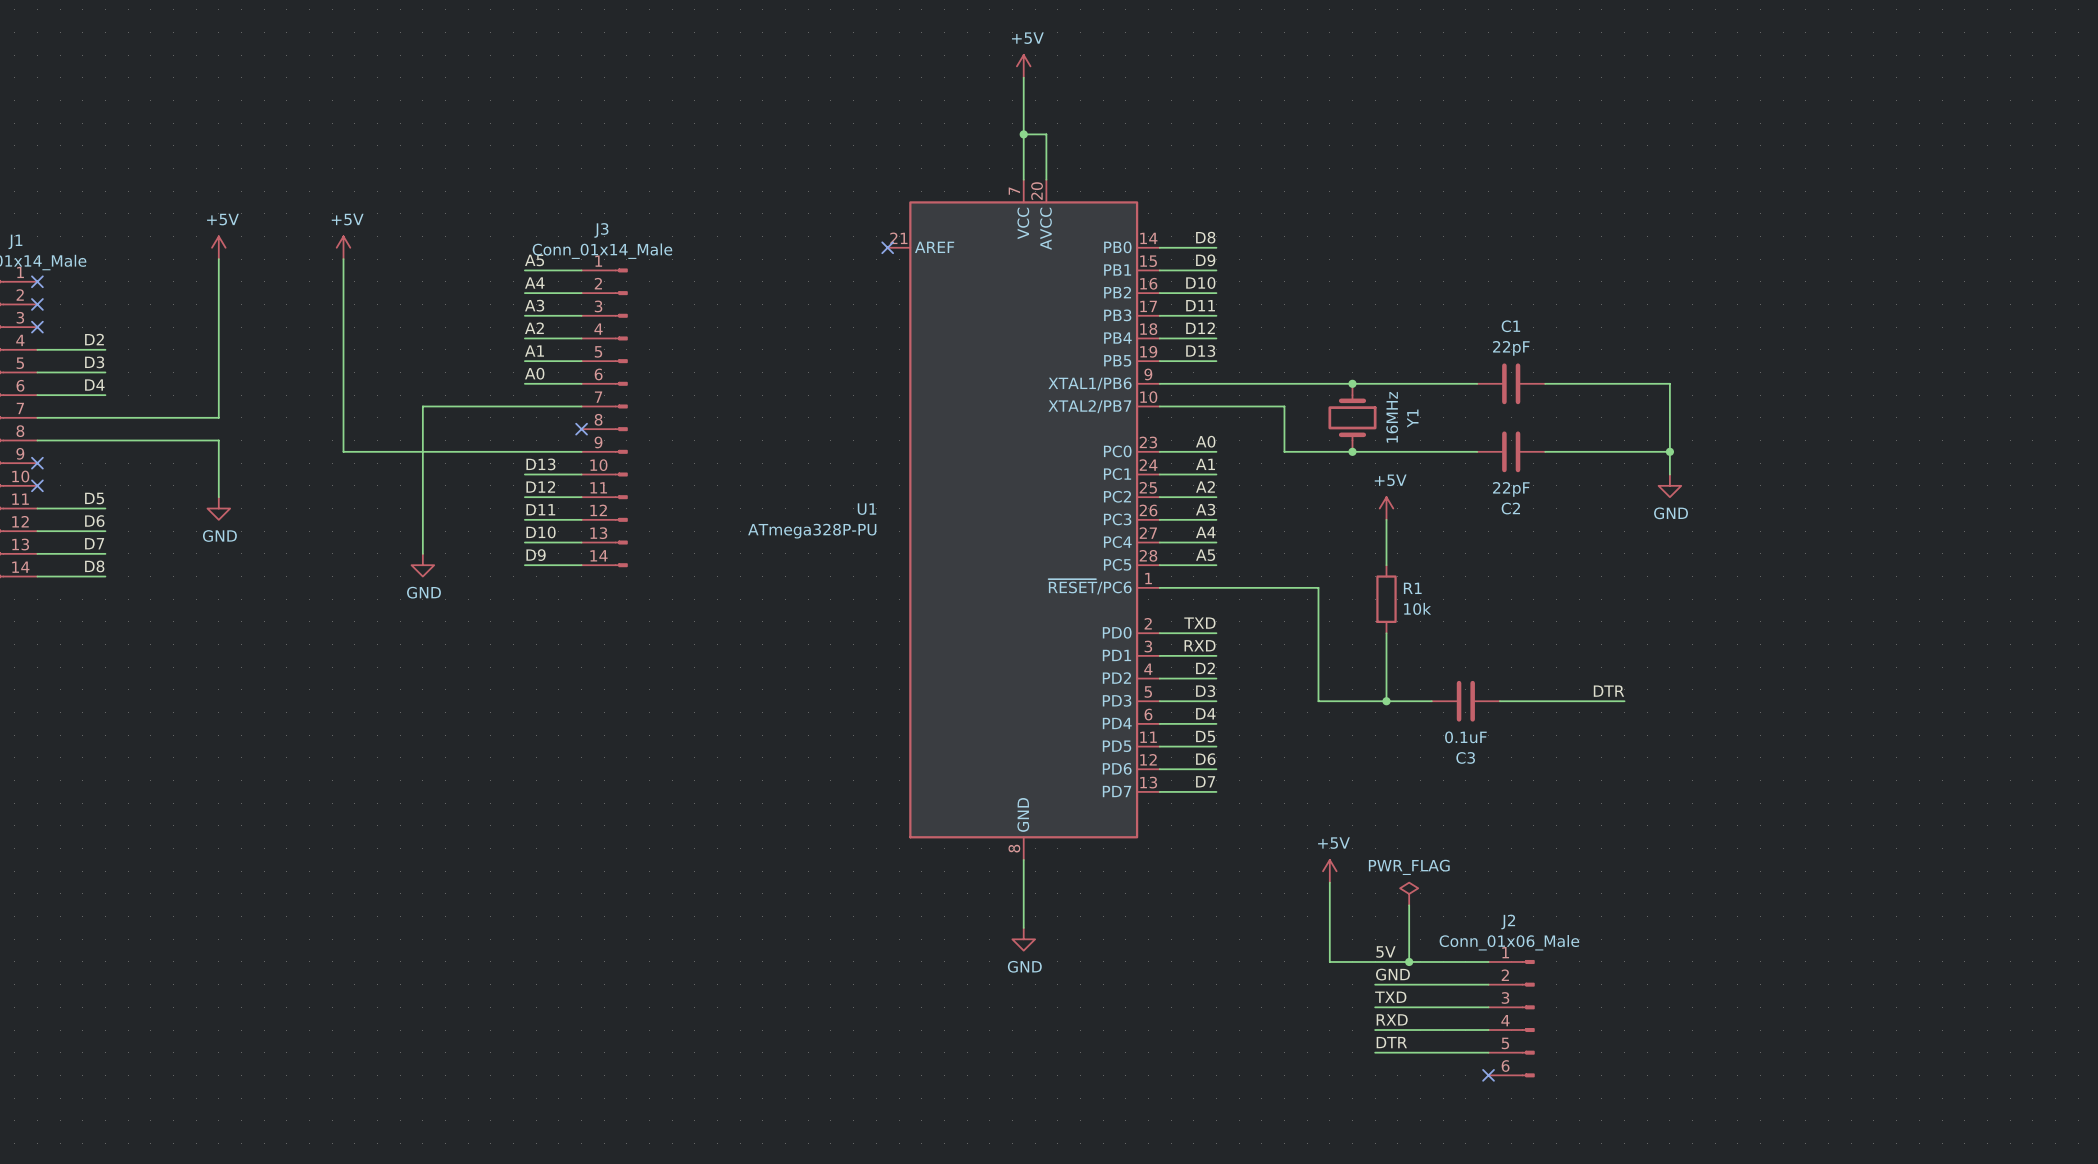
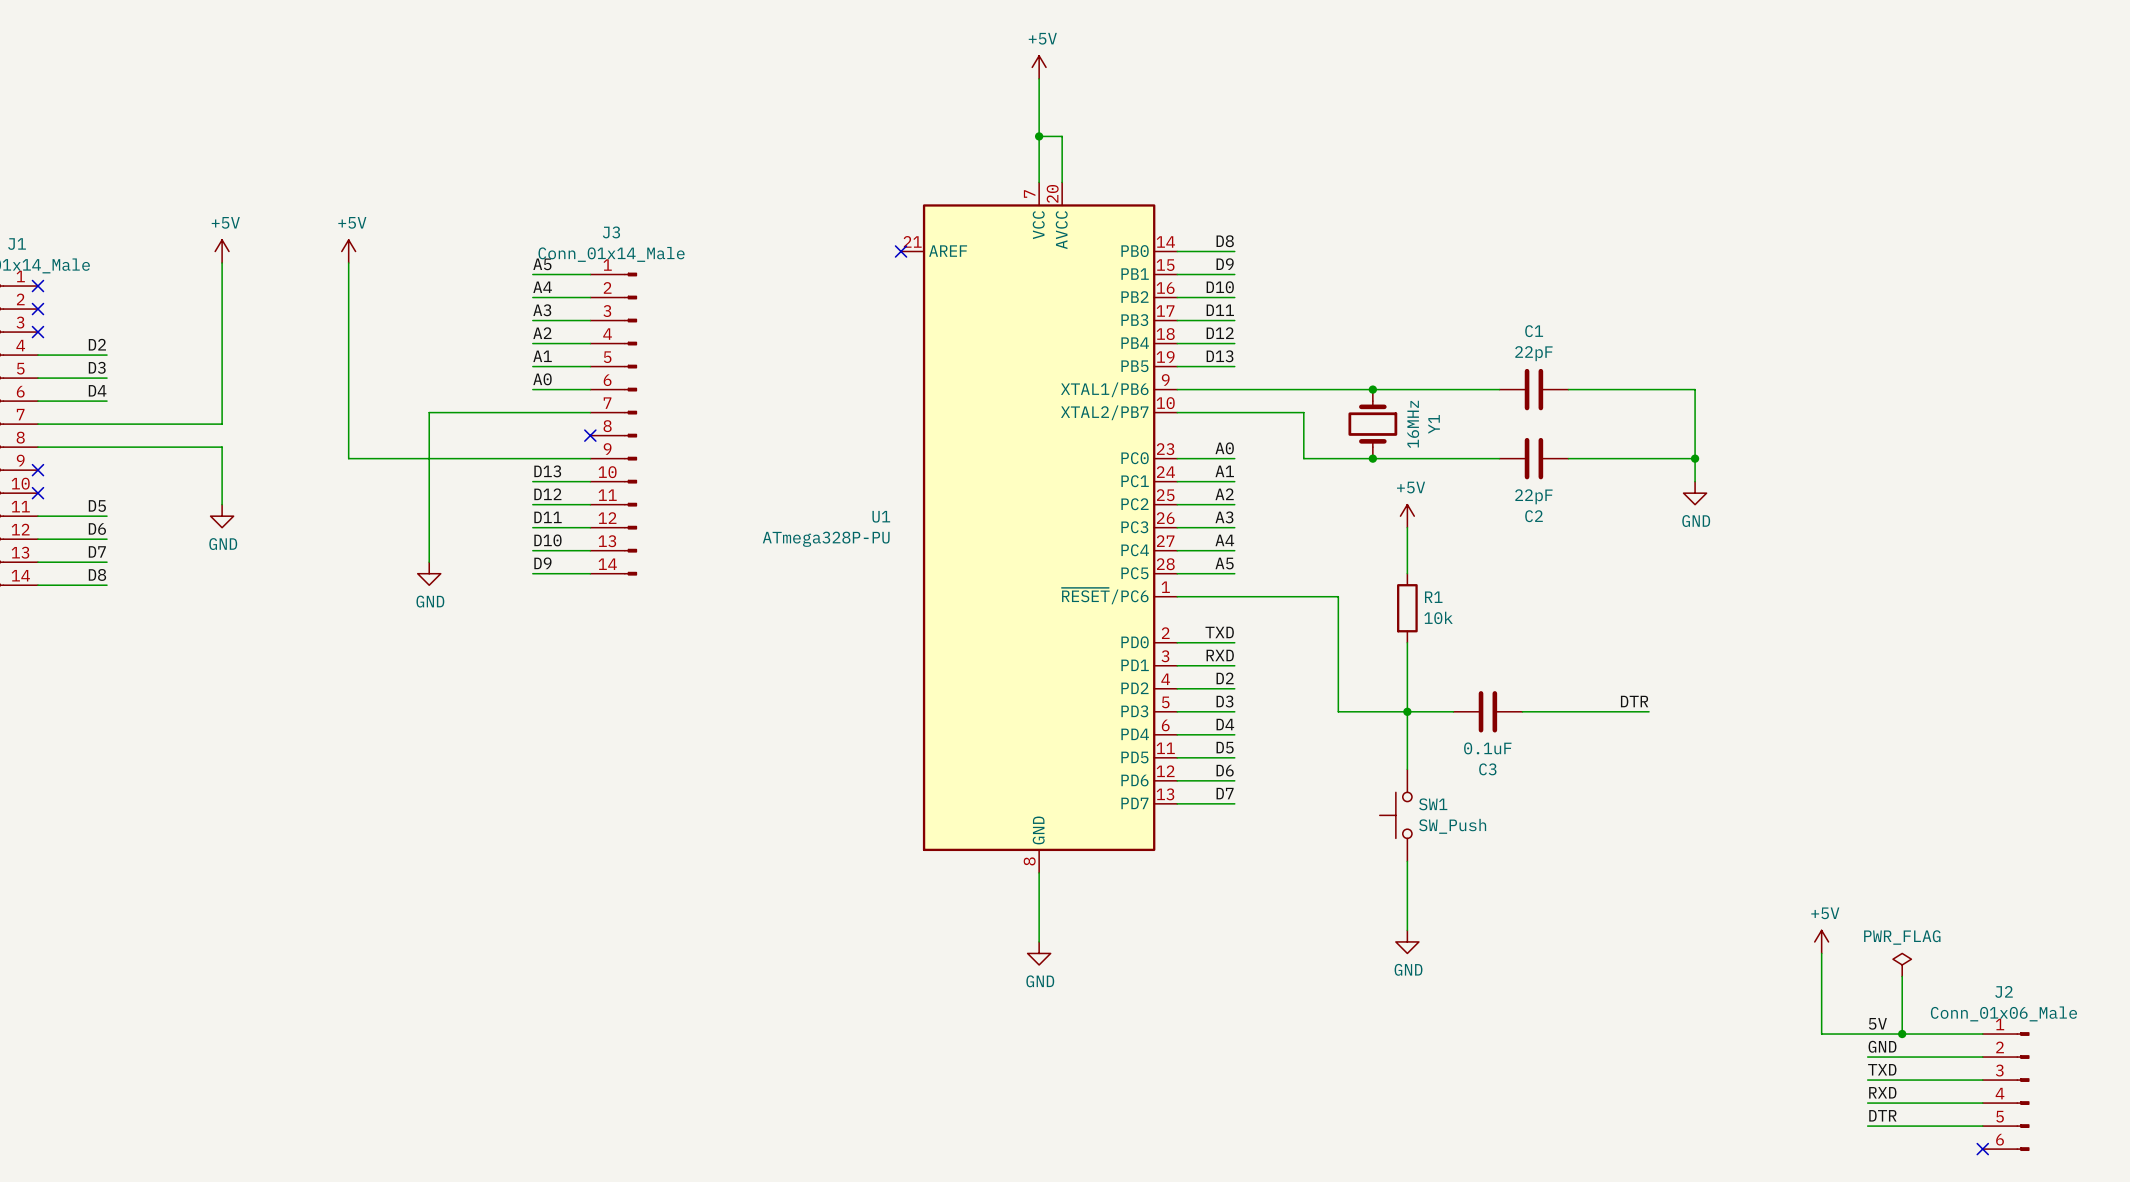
SW1: none -> SW_Push (1395, 815)
wire: none -> (1407, 861) (1407, 930)
power symbol: +5V (1329, 871) -> none
wire: (1329, 882) (1329, 961) (1488, 961) -> none
power symbol: PWR_FLAG (1409, 893) -> none
wire: (1409, 905) (1409, 961) -> (1407, 711) (1407, 769)
power symbol: none -> GND (1407, 941)
power symbol: none -> +5V (1821, 941)
wire: none -> (1821, 953) (1821, 1034) (1982, 1034)
power symbol: none -> PWR_FLAG (1902, 964)
label: 5V (1385, 951) -> none
junction: (1409, 961) -> none
wire: none -> (1902, 976) (1902, 1034)
label: GND (1392, 974) -> none
wire: (1375, 984) (1488, 984) -> none
label: TXD (1390, 997) -> none
wire: (1375, 1007) (1488, 1007) -> none
label: none -> 5V (1877, 1023)
J2 position: (1511, 1018) -> (2006, 1091)
junction: none -> (1902, 1034)
label: RXD (1392, 1019) -> none
wire: (1375, 1030) (1488, 1030) -> none
label: none -> GND (1882, 1046)
wire: none -> (1867, 1057) (1982, 1057)
label: DTR (1391, 1042) -> none
wire: (1375, 1052) (1488, 1052) -> none
label: none -> TXD (1882, 1069)
wire: none -> (1867, 1080) (1982, 1080)
no-connect mark: (1488, 1075) -> none
label: none -> RXD (1882, 1092)
wire: none -> (1867, 1103) (1982, 1103)
label: none -> DTR (1882, 1115)
wire: none -> (1867, 1126) (1982, 1126)
no-connect mark: none -> (1982, 1149)

